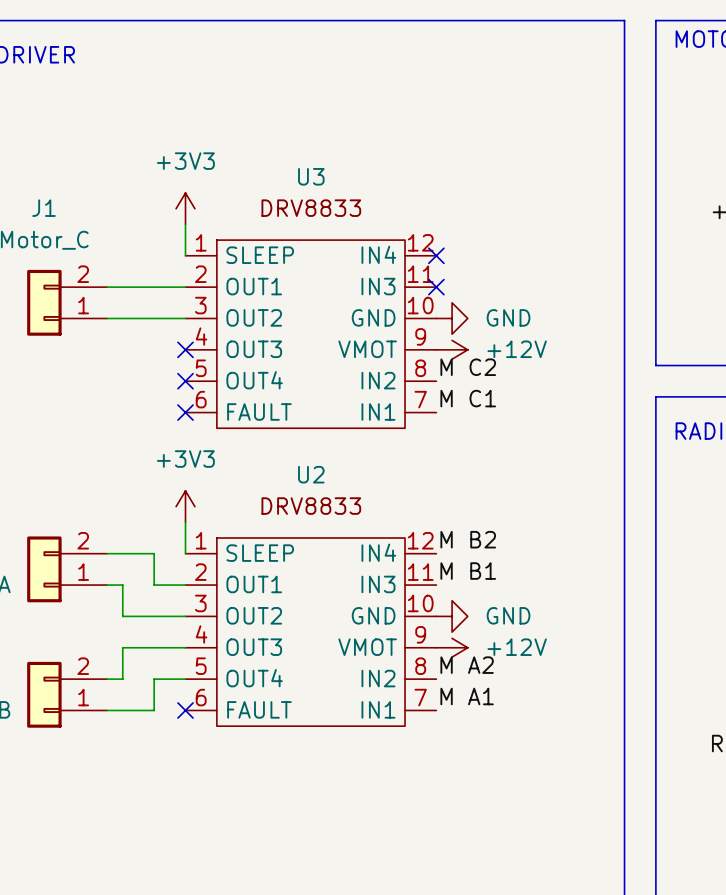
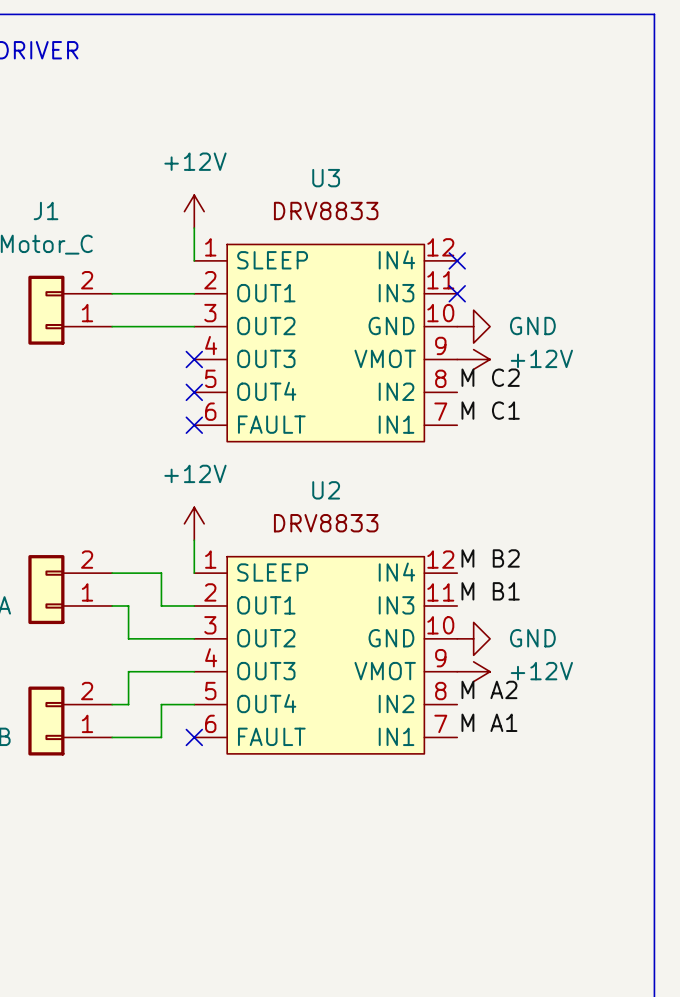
power symbol: +3V3 (185, 208) -> +12V (194, 211)
U3 symbol: [185, 240, 437, 429] -> [194, 244, 458, 442]
power symbol: +3V3 (185, 506) -> +12V (194, 523)
U2 symbol: [185, 538, 437, 727] -> [194, 556, 458, 754]

